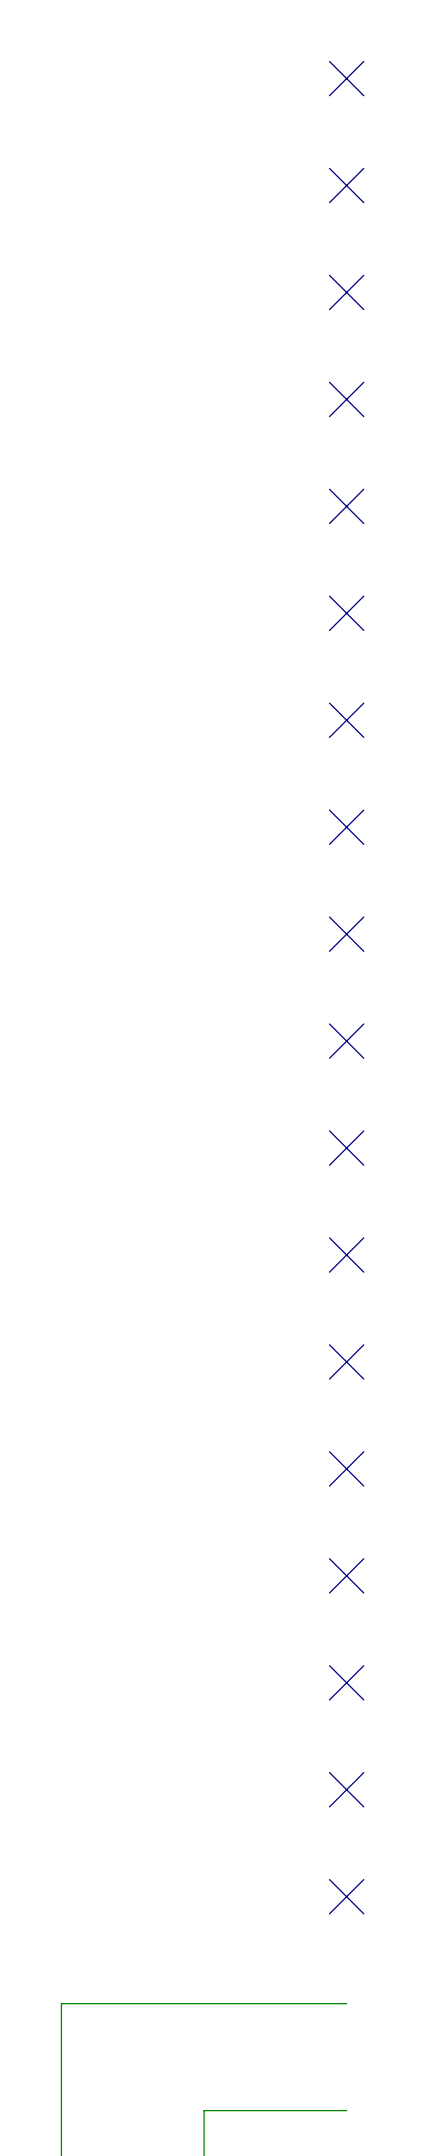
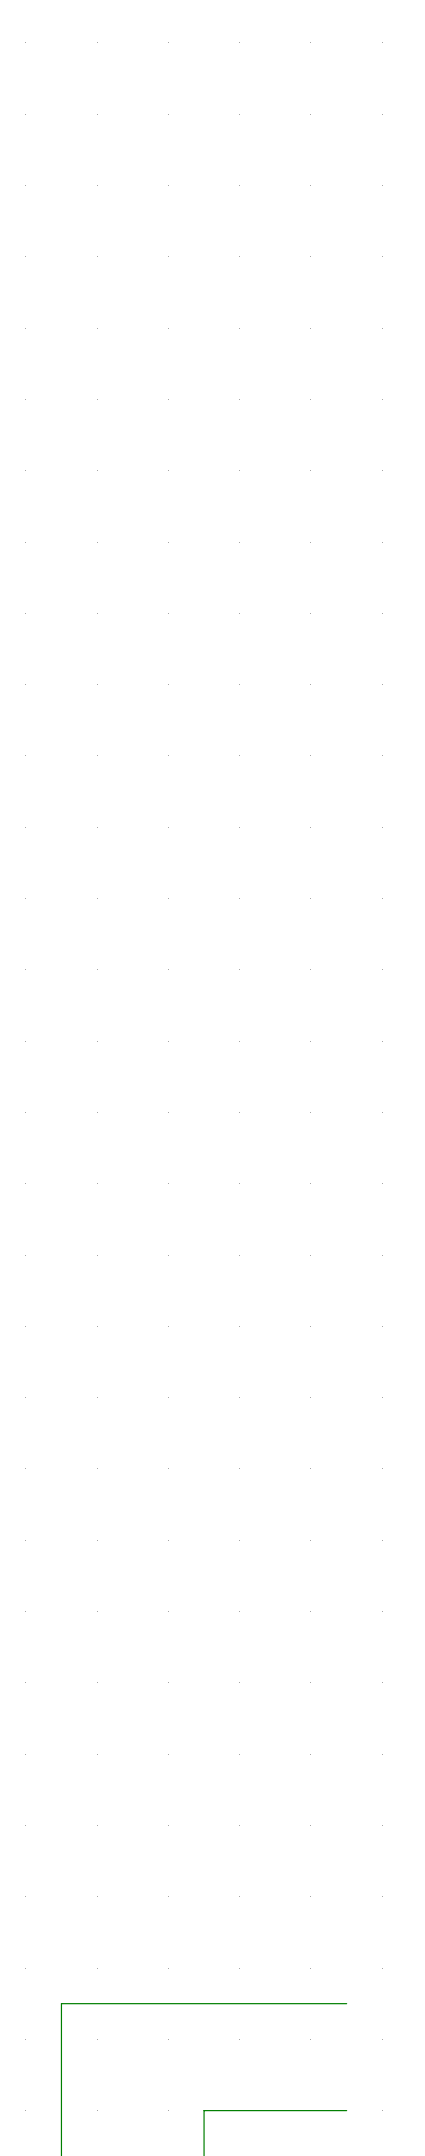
no-connect mark: (346, 78) -> none
no-connect mark: (346, 185) -> none
no-connect mark: (346, 292) -> none
no-connect mark: (346, 399) -> none
no-connect mark: (346, 506) -> none
no-connect mark: (346, 613) -> none
no-connect mark: (346, 720) -> none
no-connect mark: (346, 827) -> none
no-connect mark: (346, 934) -> none
no-connect mark: (346, 1041) -> none
no-connect mark: (346, 1148) -> none
no-connect mark: (346, 1255) -> none
no-connect mark: (346, 1361) -> none
no-connect mark: (346, 1468) -> none
no-connect mark: (346, 1575) -> none
no-connect mark: (346, 1682) -> none
no-connect mark: (346, 1789) -> none
no-connect mark: (346, 1896) -> none

